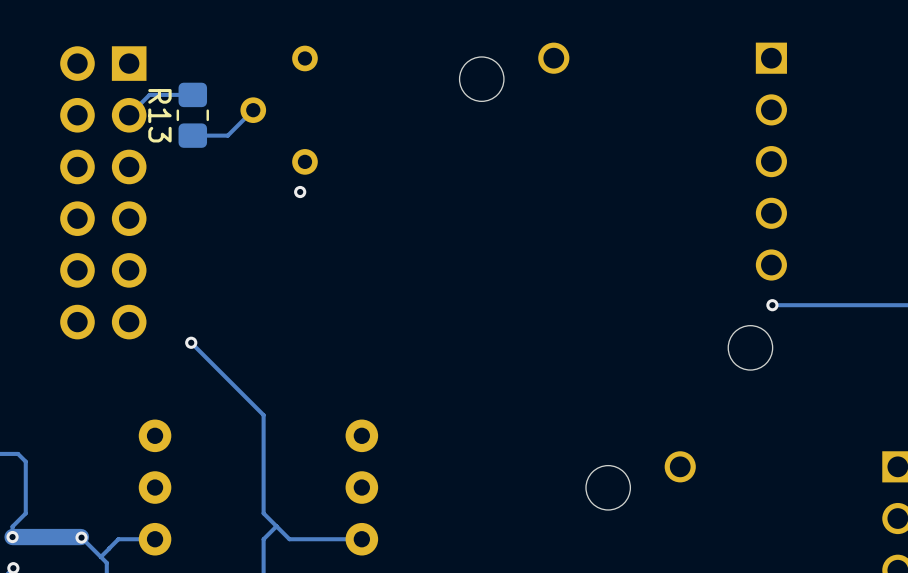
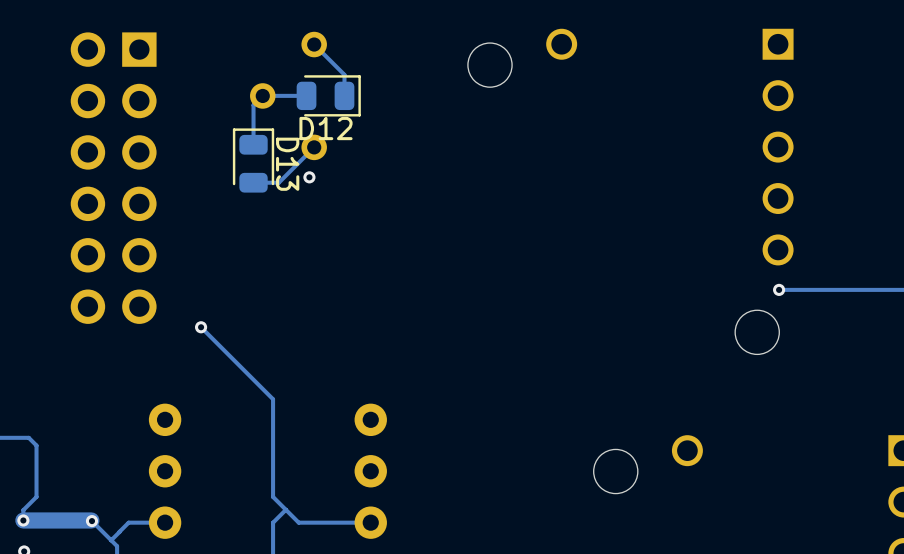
track: none -> (314, 44) (344, 74) (344, 95)
track: (192, 94) (149, 94) (129, 115) -> none
track: none -> (306, 95) (270, 95)
D12: none -> (328, 95)
R13: (192, 115) -> none
track: (243, 119) (227, 135) (192, 135) -> (253, 105) (253, 144)
track: none -> (314, 147) (278, 182) (253, 182)
D13: none -> (253, 160)

